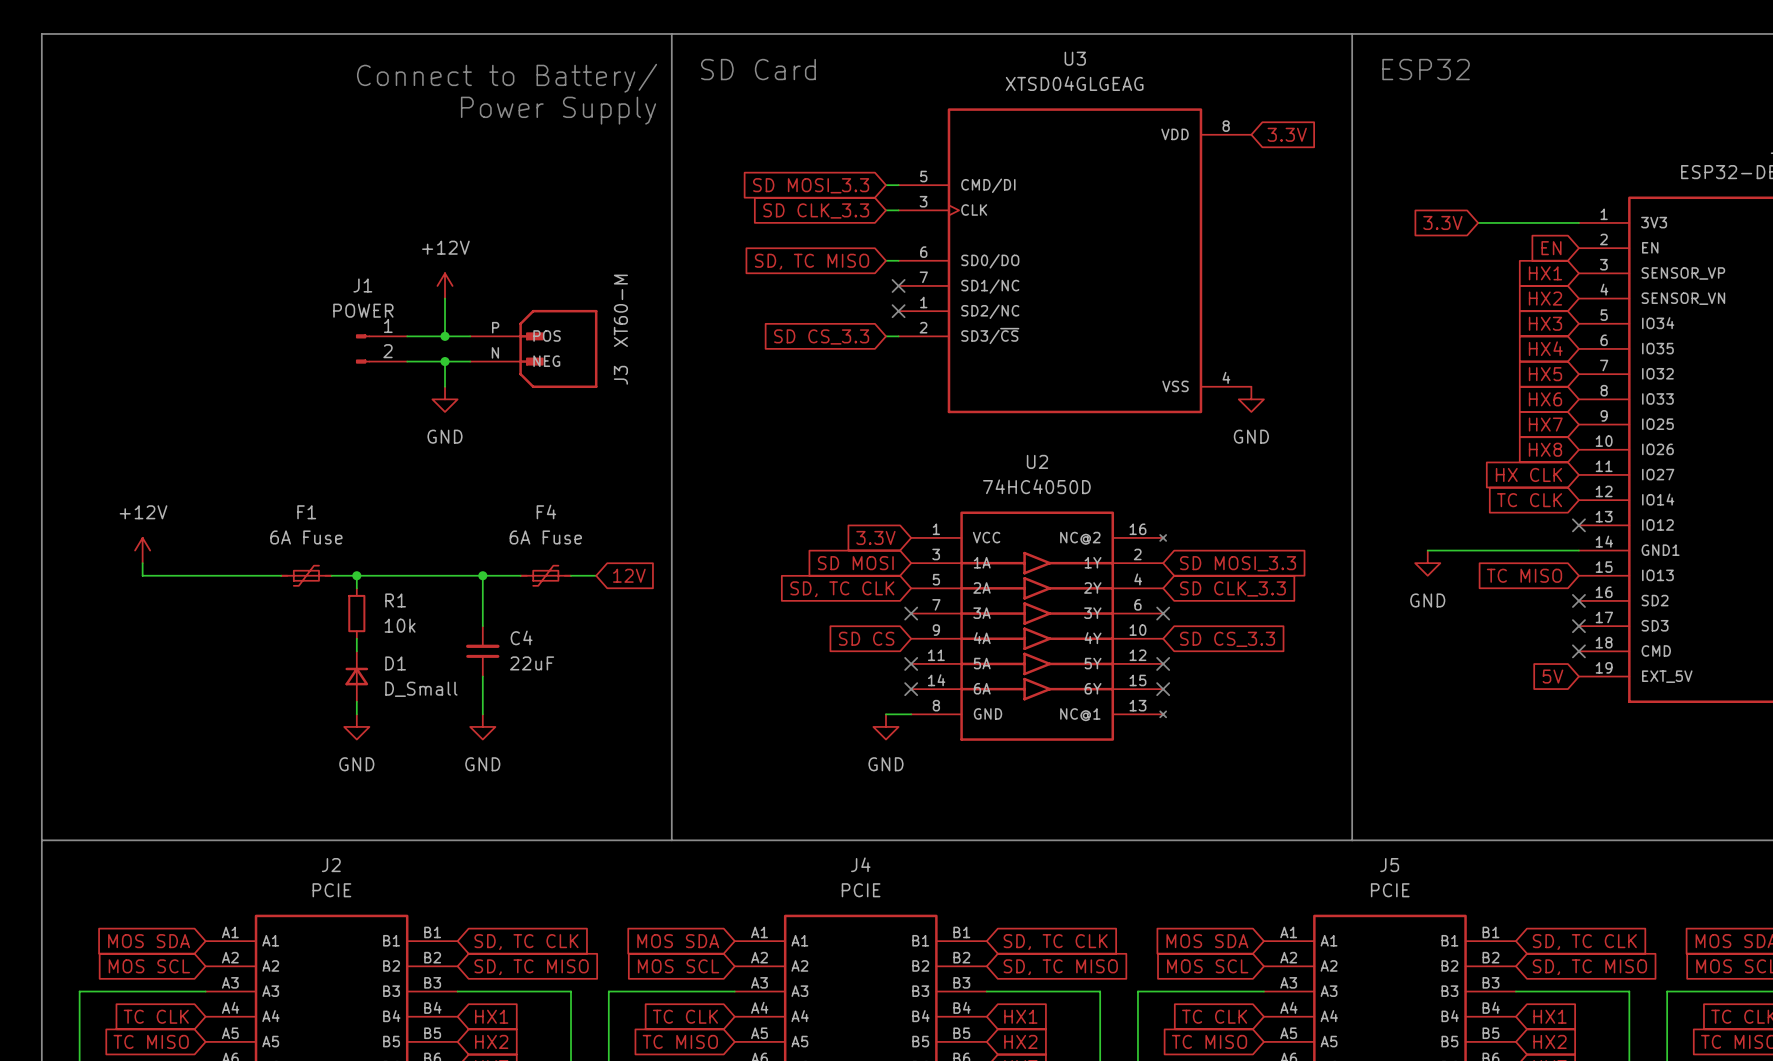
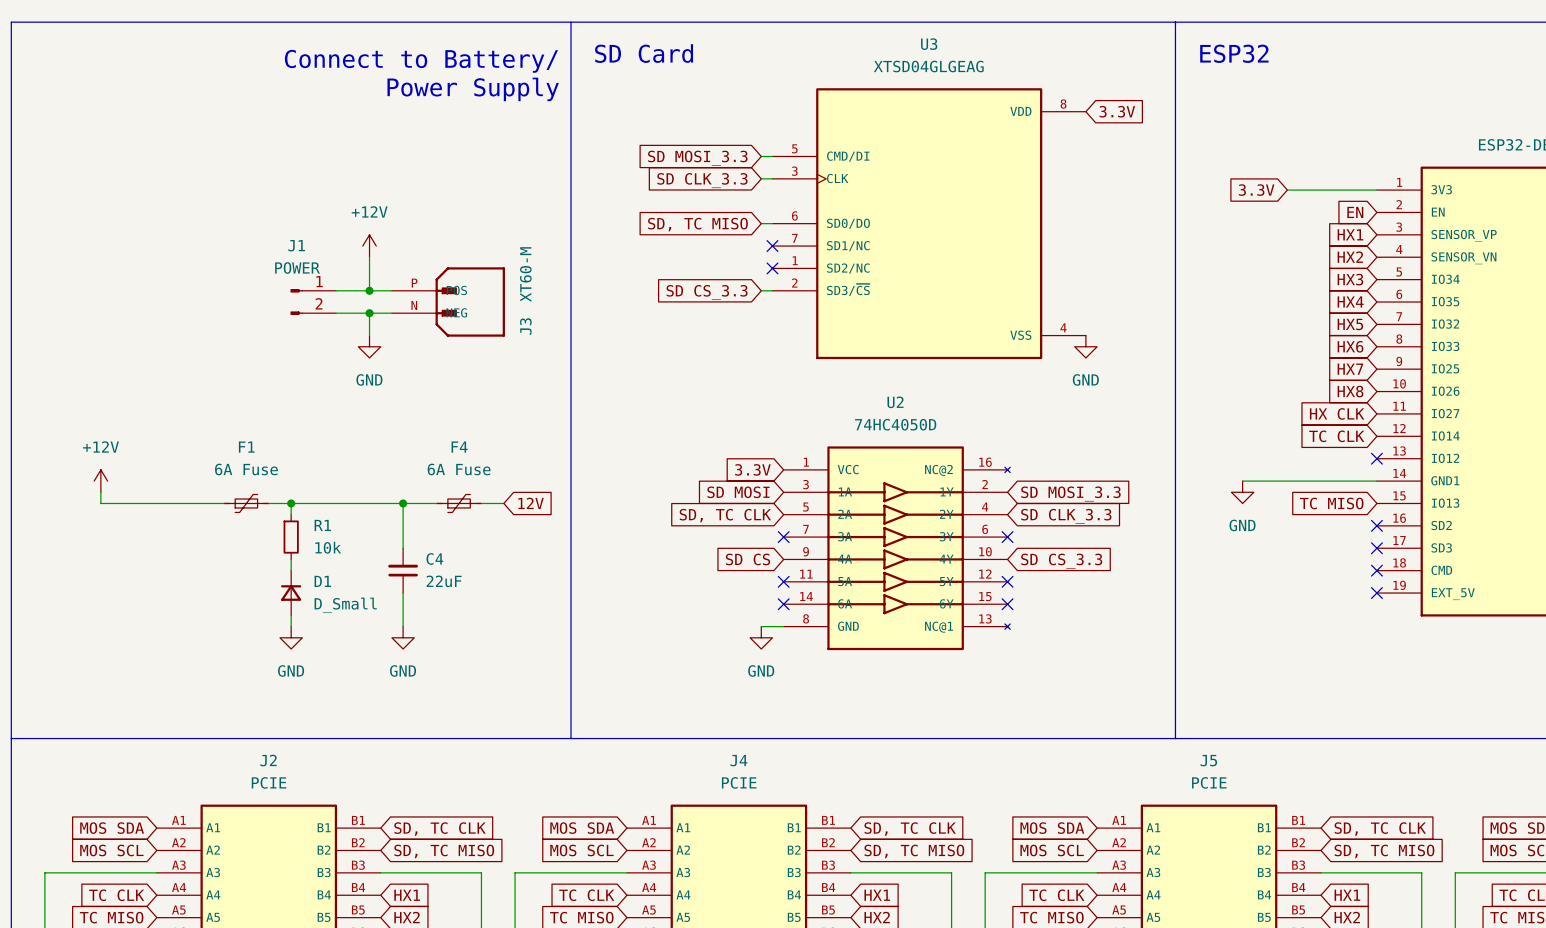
global label: 5V (1552, 676) -> none
no-connect mark: none -> (1376, 593)

